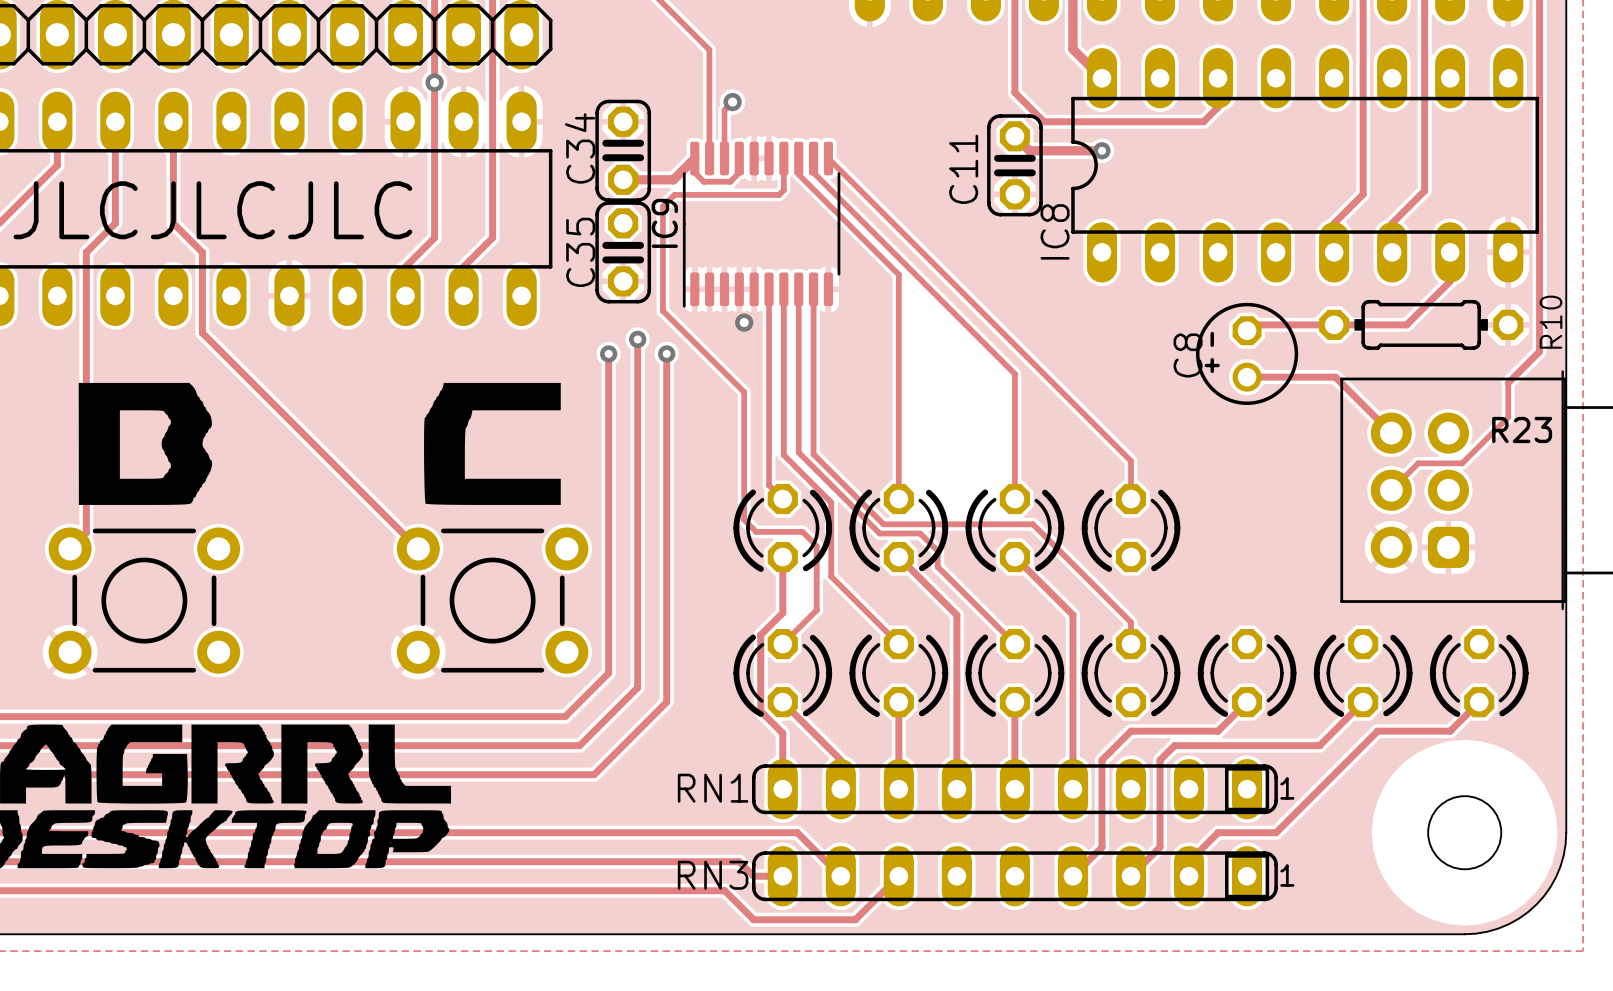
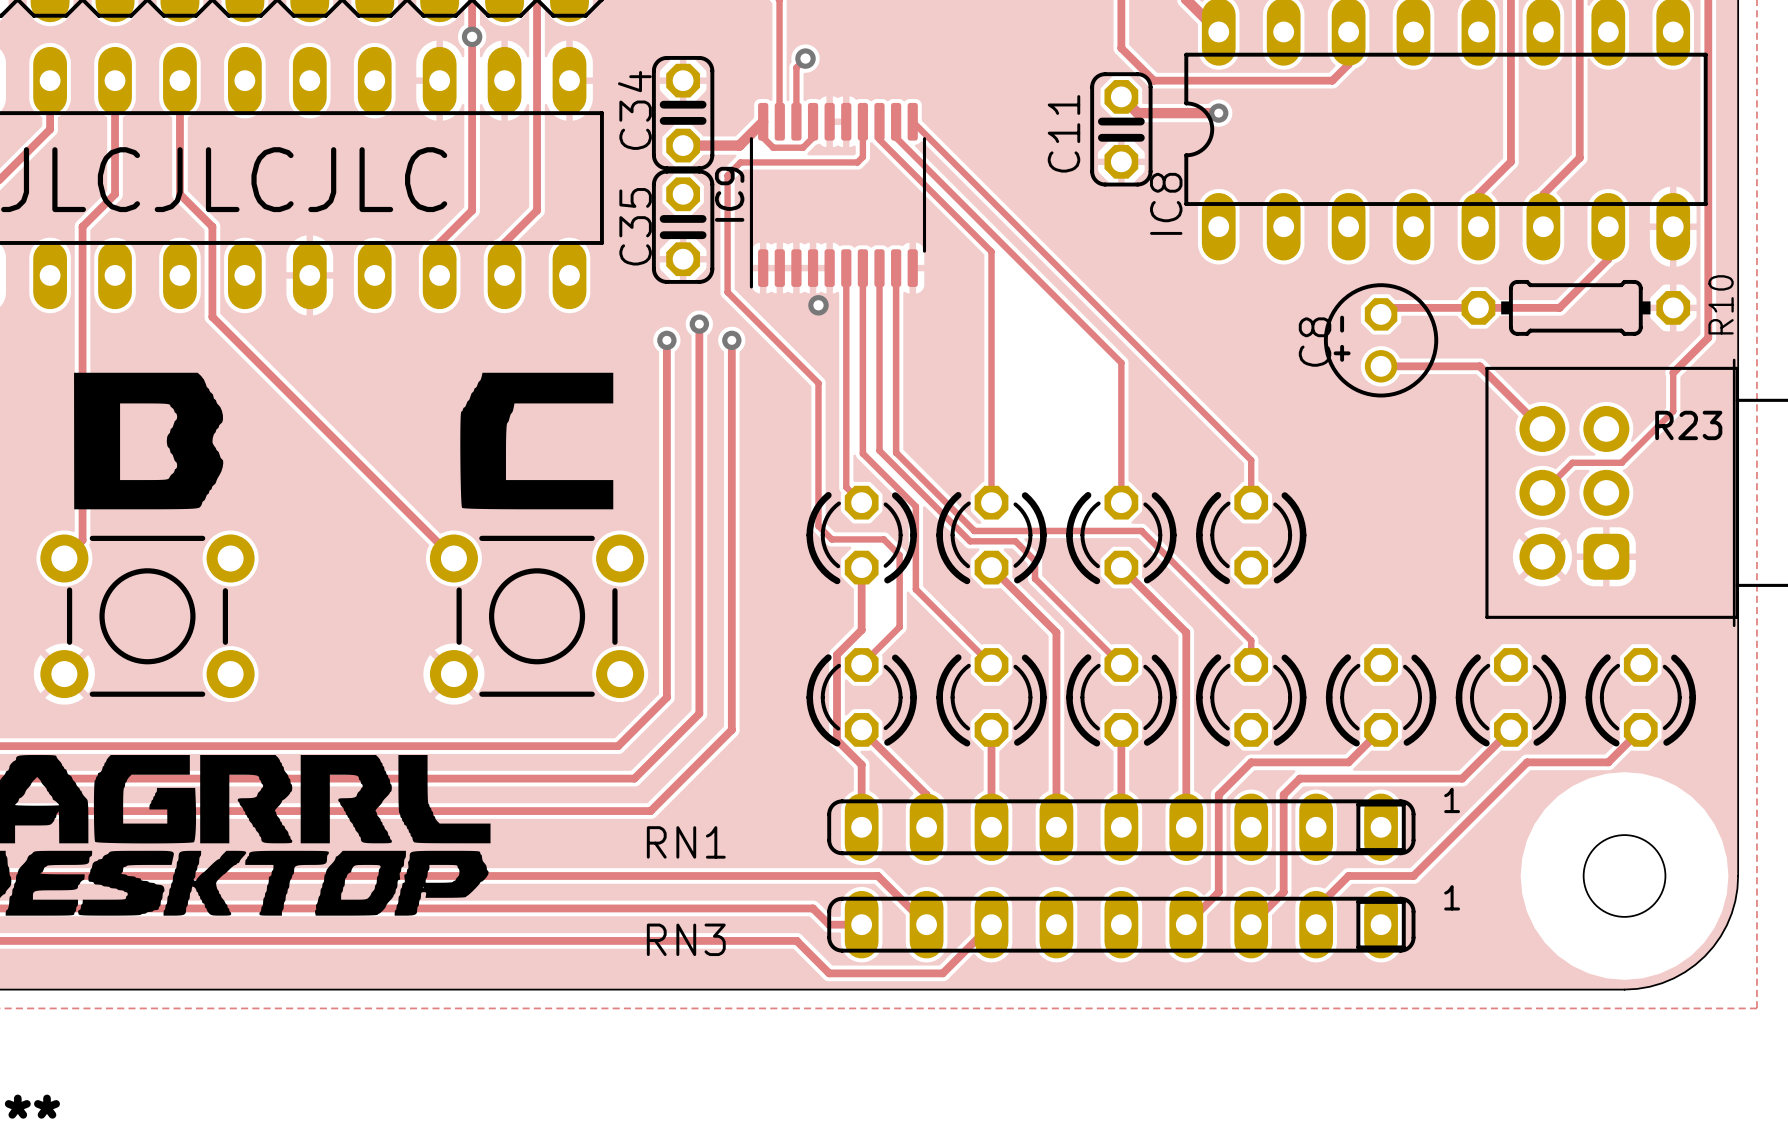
RN1 name position: RN1 (713, 788) -> RN1 (686, 842)
RN1 text position: 1 (1287, 788) -> 1 (1452, 800)
RN3 name position: RN3 (713, 875) -> RN3 (686, 939)
RN3 text position: 1 (1287, 875) -> 1 (1452, 897)

